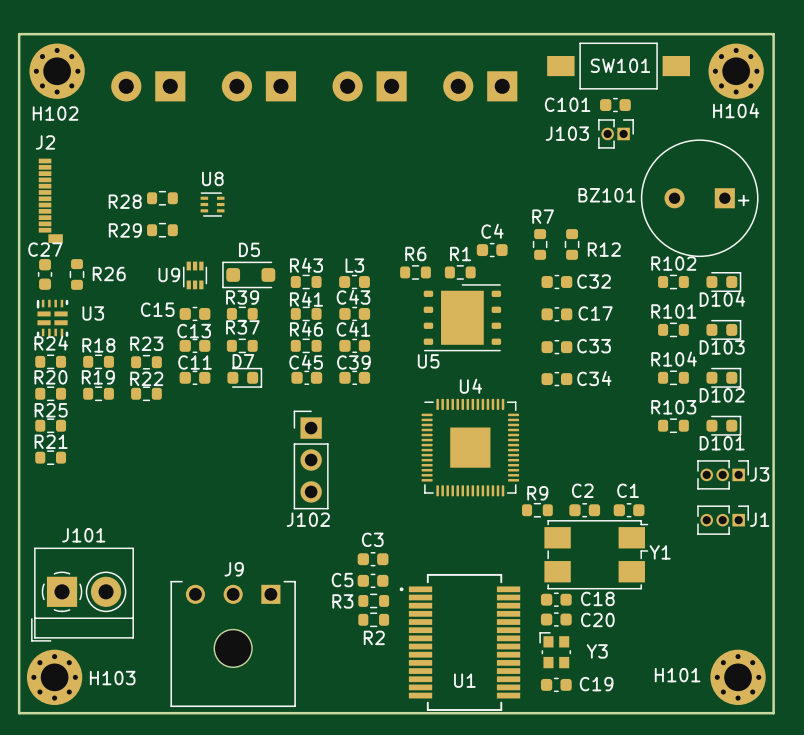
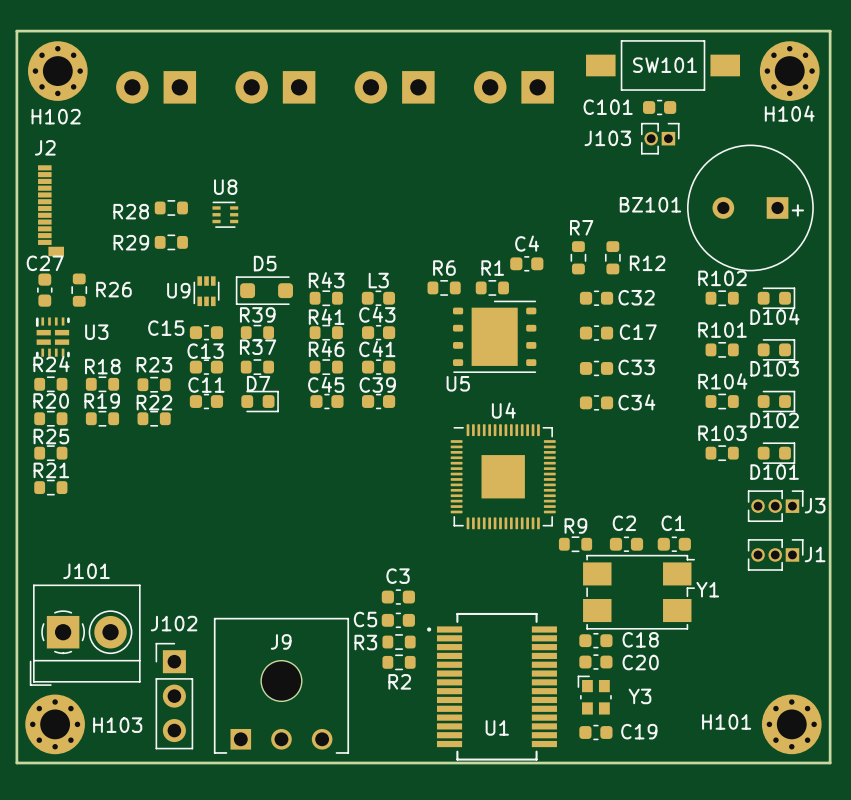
J102 position: (311, 459) -> (174, 696)
J102 name position: J102 (308, 519) -> J102 (174, 623)
J9 name position: J9 (234, 569) -> J9 (281, 641)
J9 rotation: 0° (233, 643) -> 180° (281, 685)

